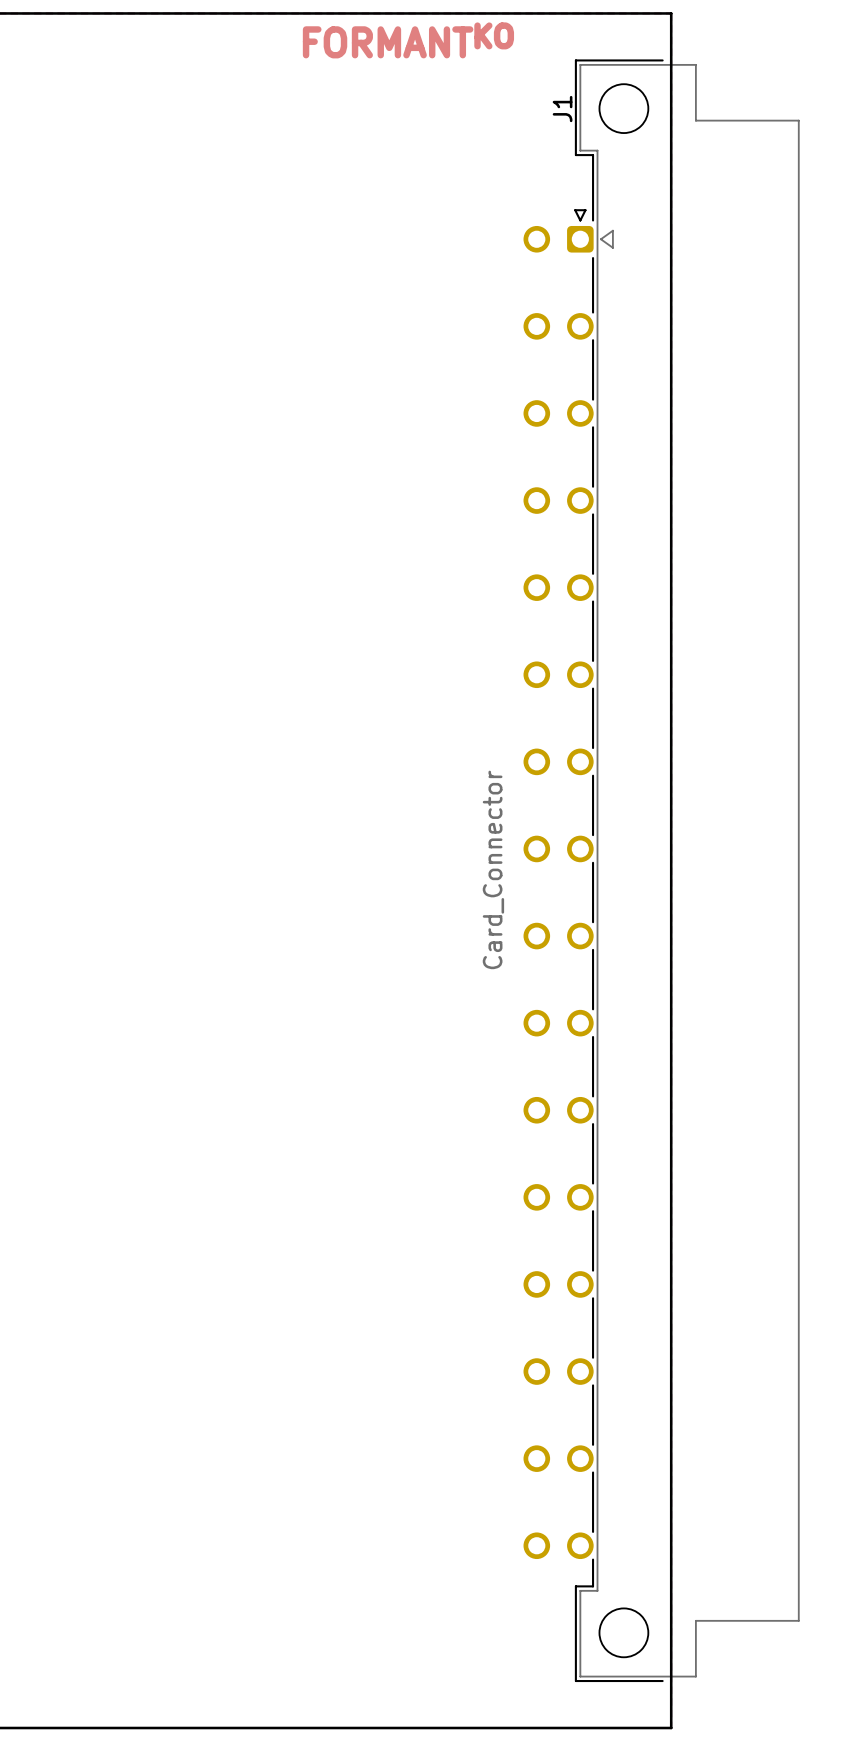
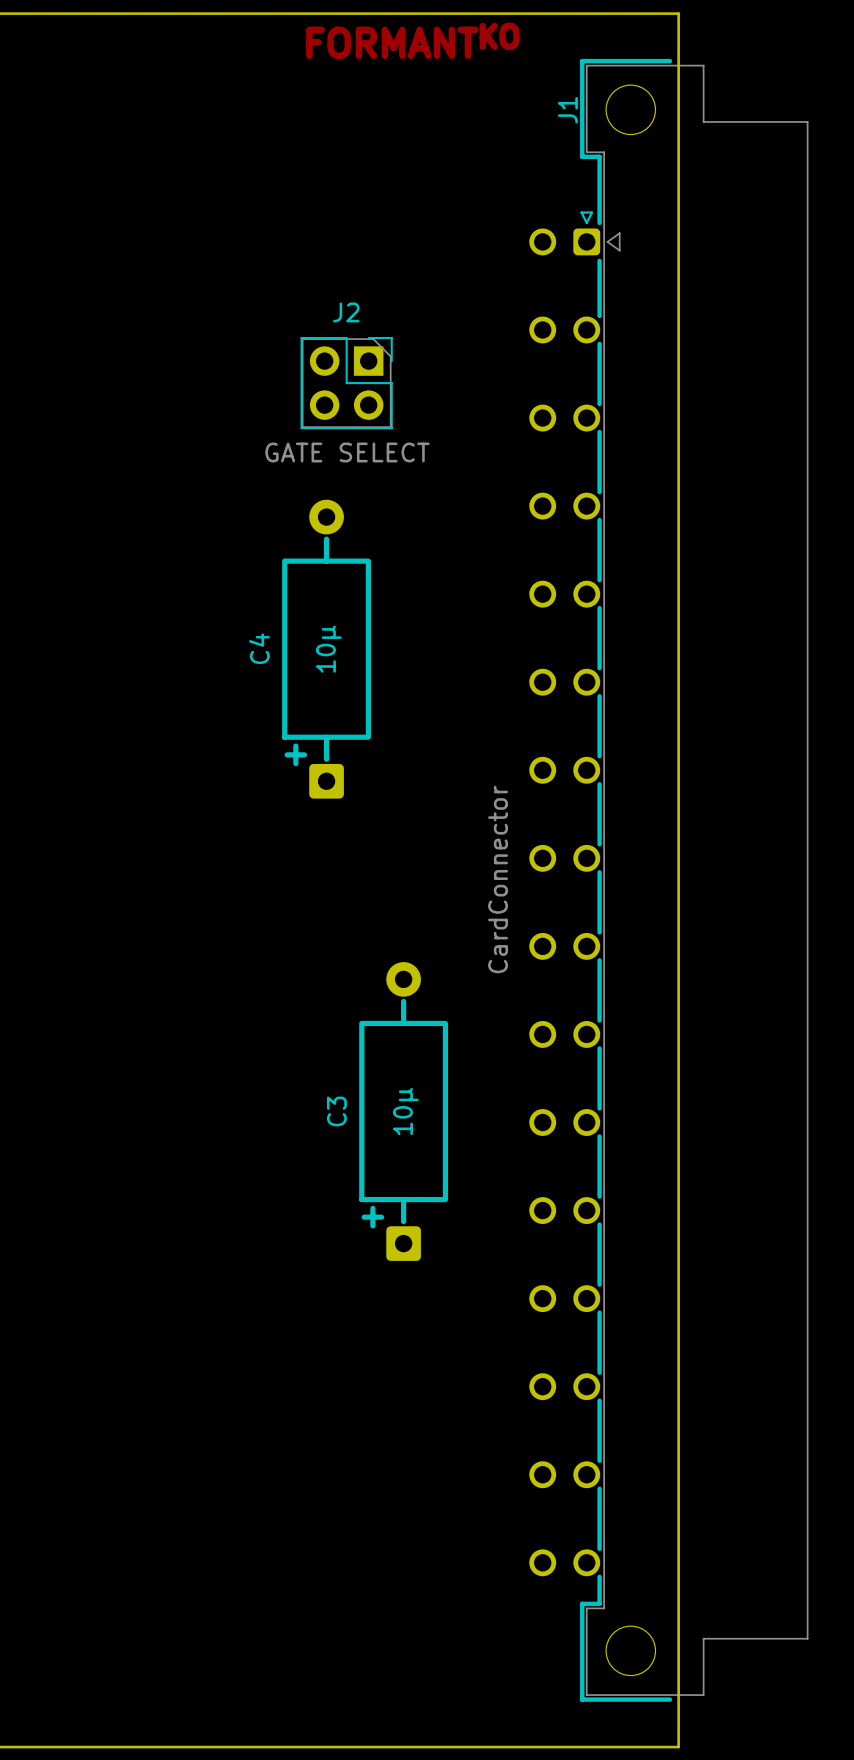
J1 footprint: [523, 59, 800, 1683] -> [529, 58, 809, 1702]
J2: none -> GATE SELECT (346, 383)
C4: none -> 10µ (326, 649)
J1 value: Card_Connector (493, 869) -> CardConnector (498, 879)
C3: none -> 10µ (403, 1111)

